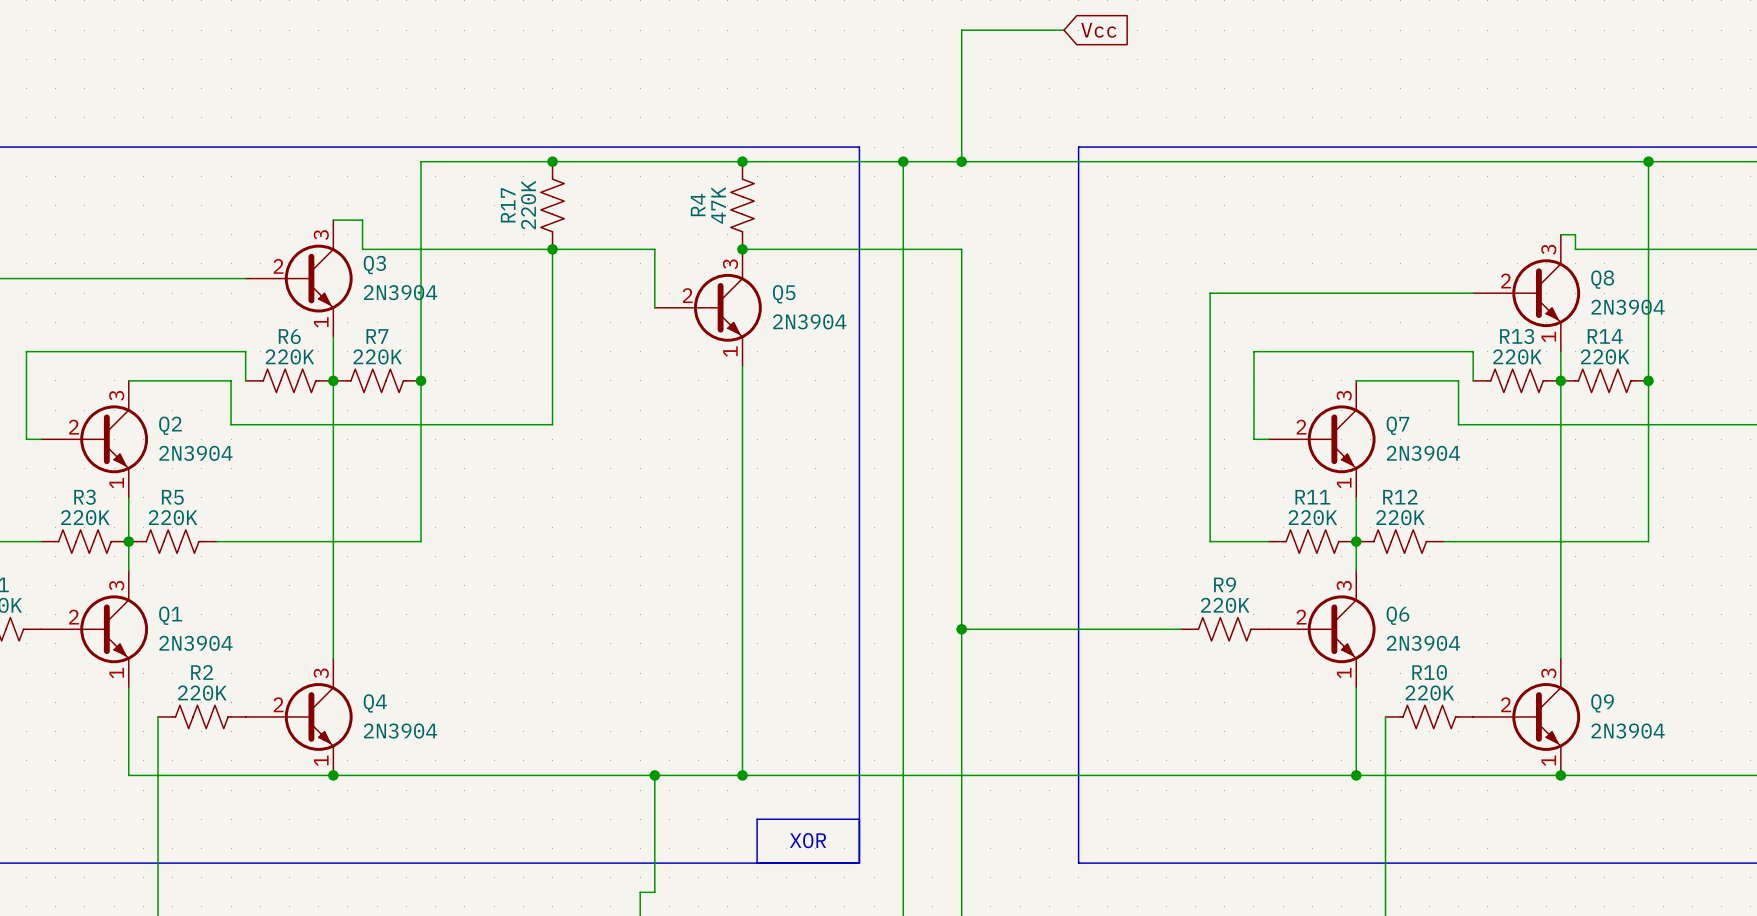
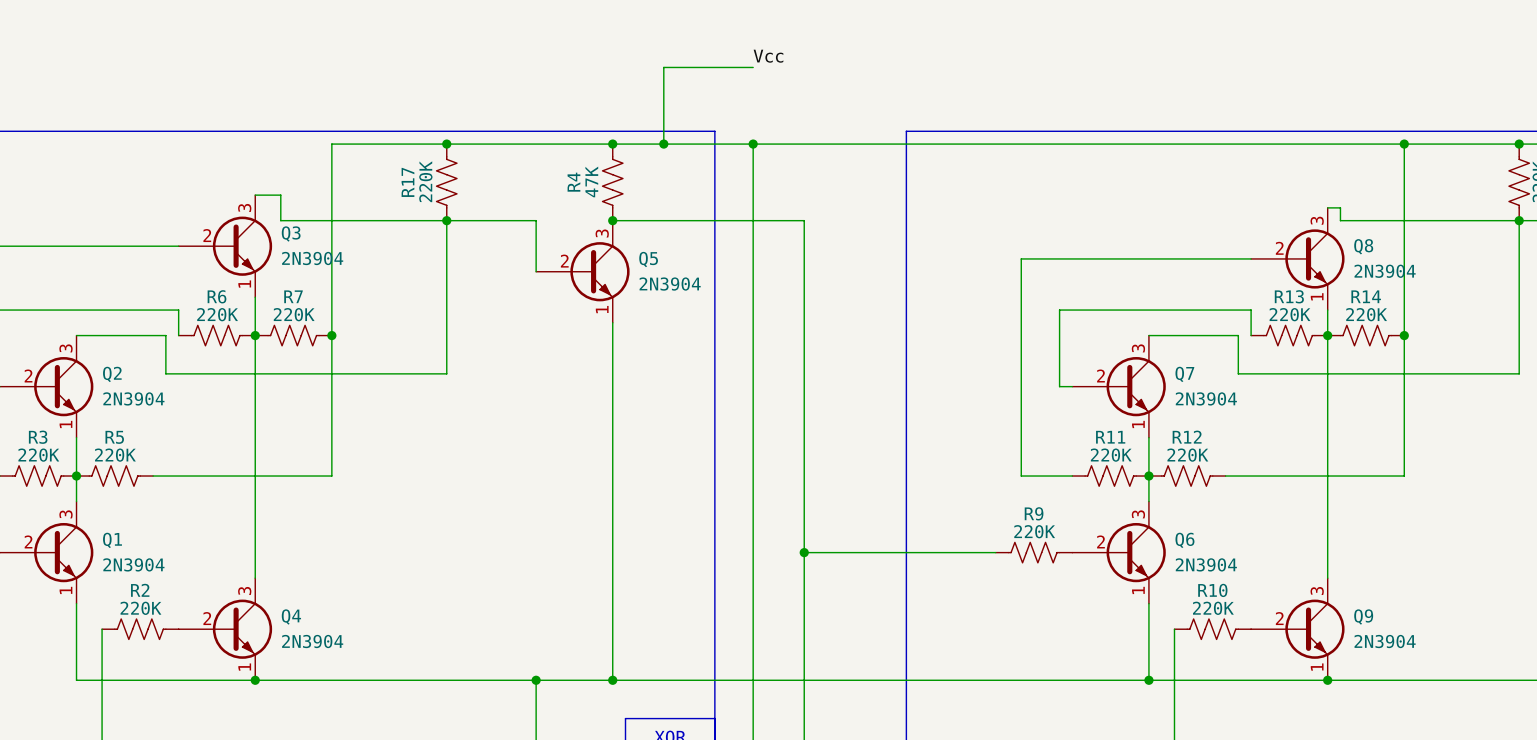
wire: (1064, 30) (961, 30) (961, 161) -> none
global label: Vcc (1098, 30) -> none
label: none -> Vcc (768, 56)
wire: none -> (753, 67) (663, 67) (663, 144)
junction: none -> (663, 144)
junction: (961, 161) -> none

